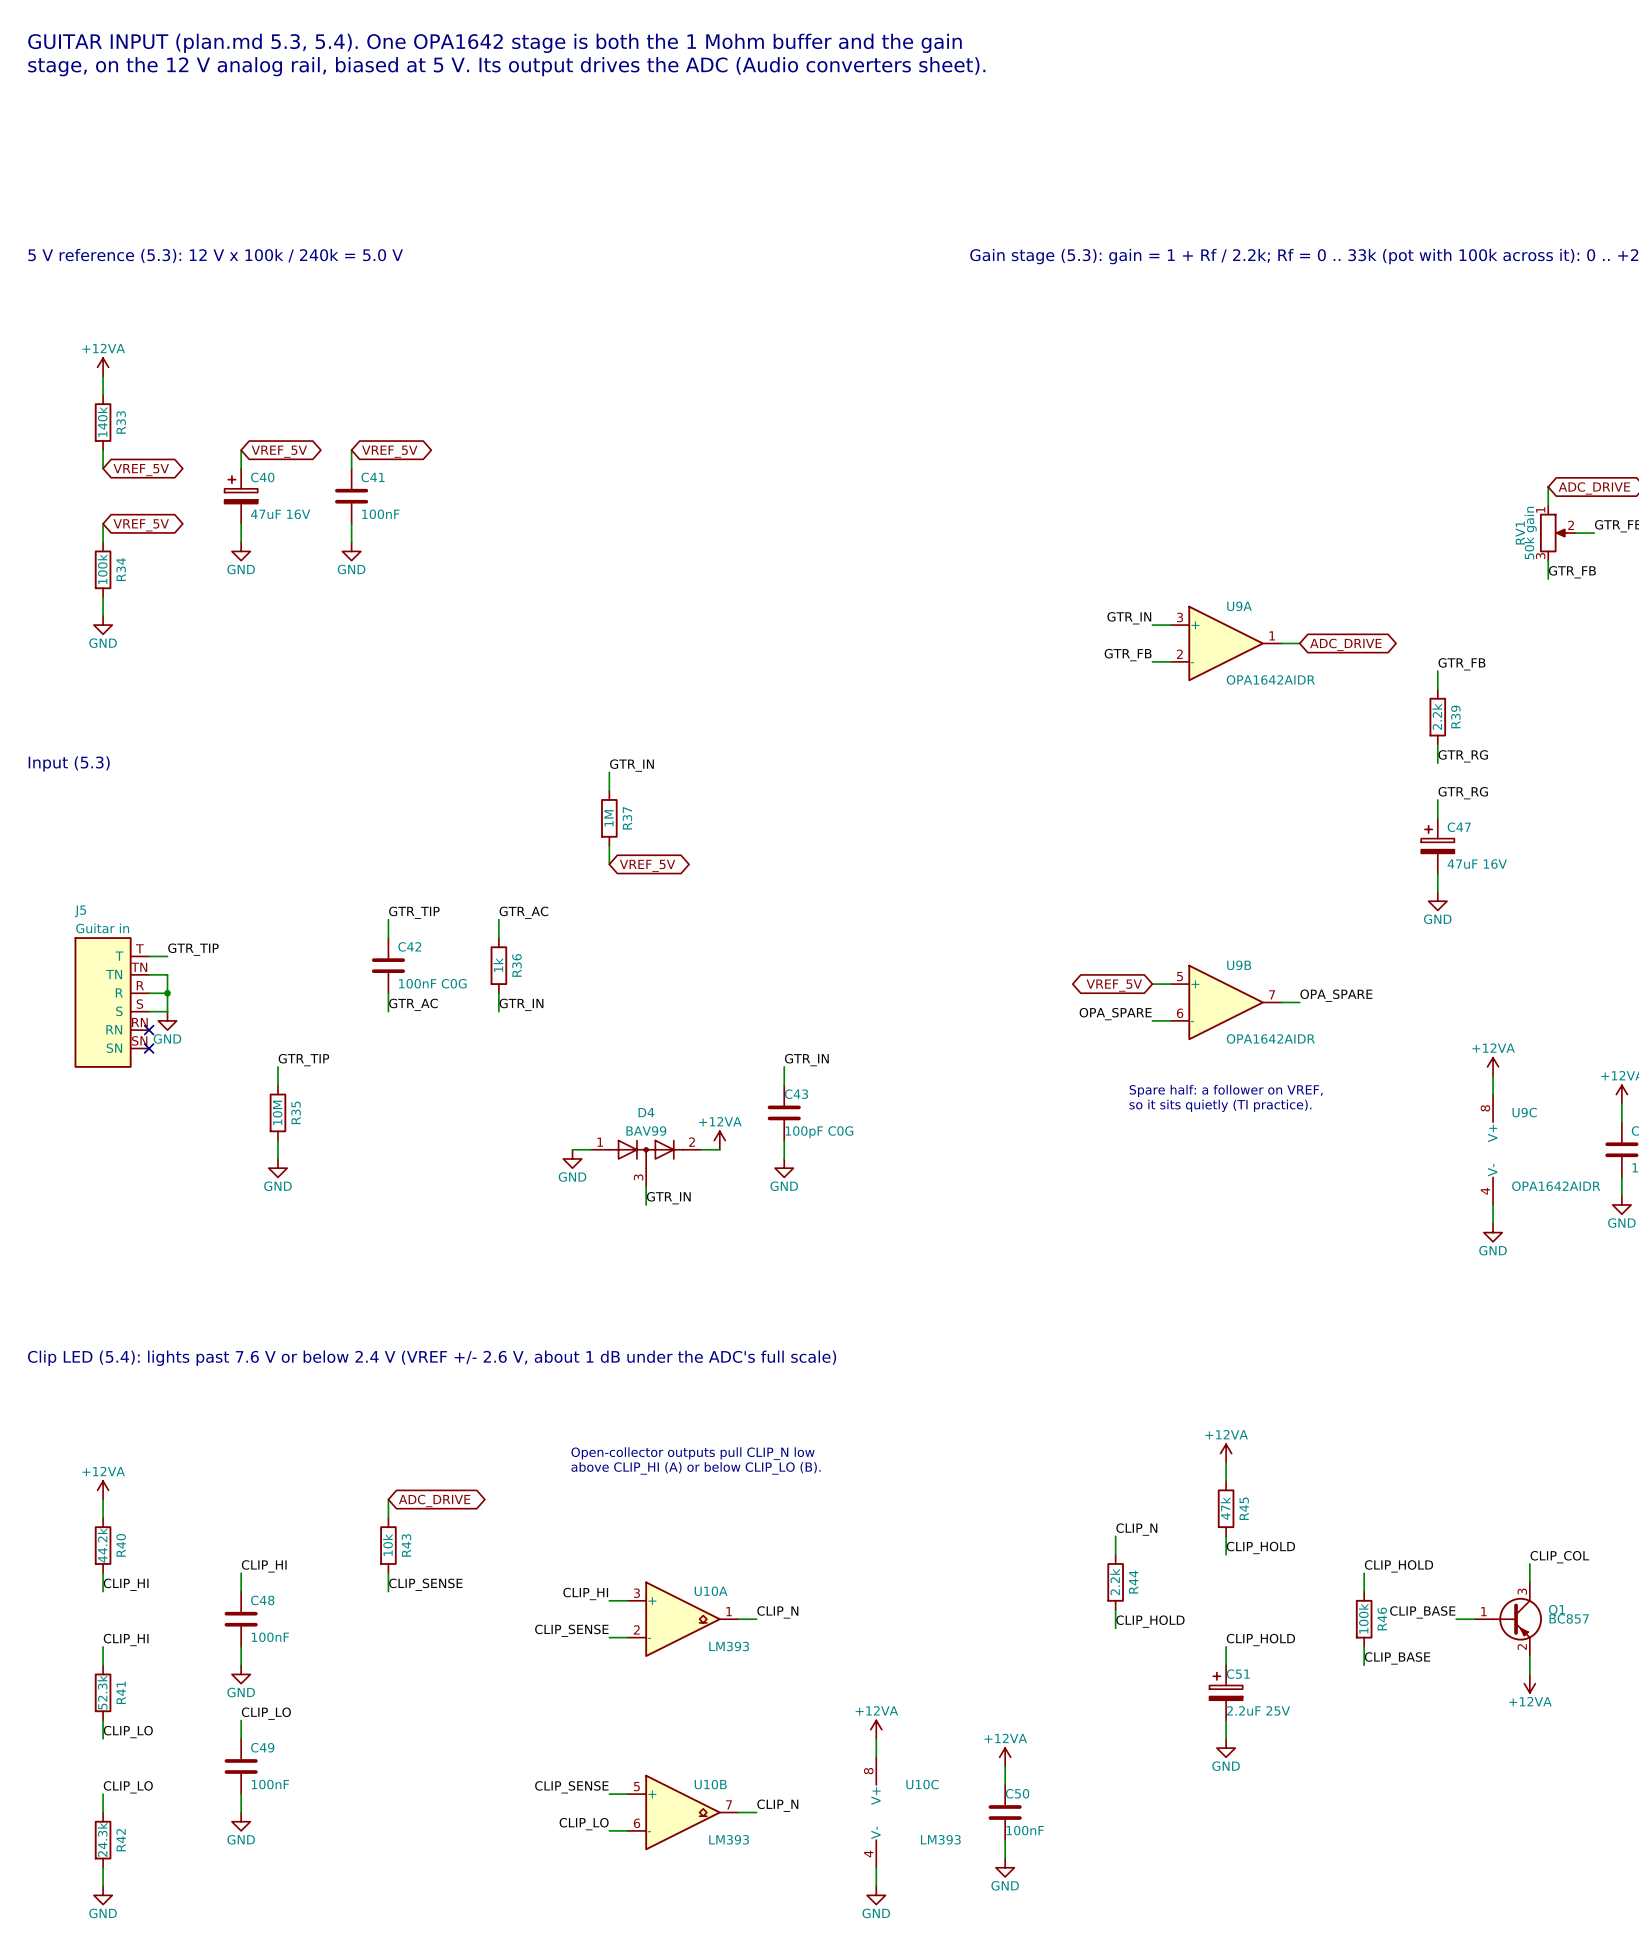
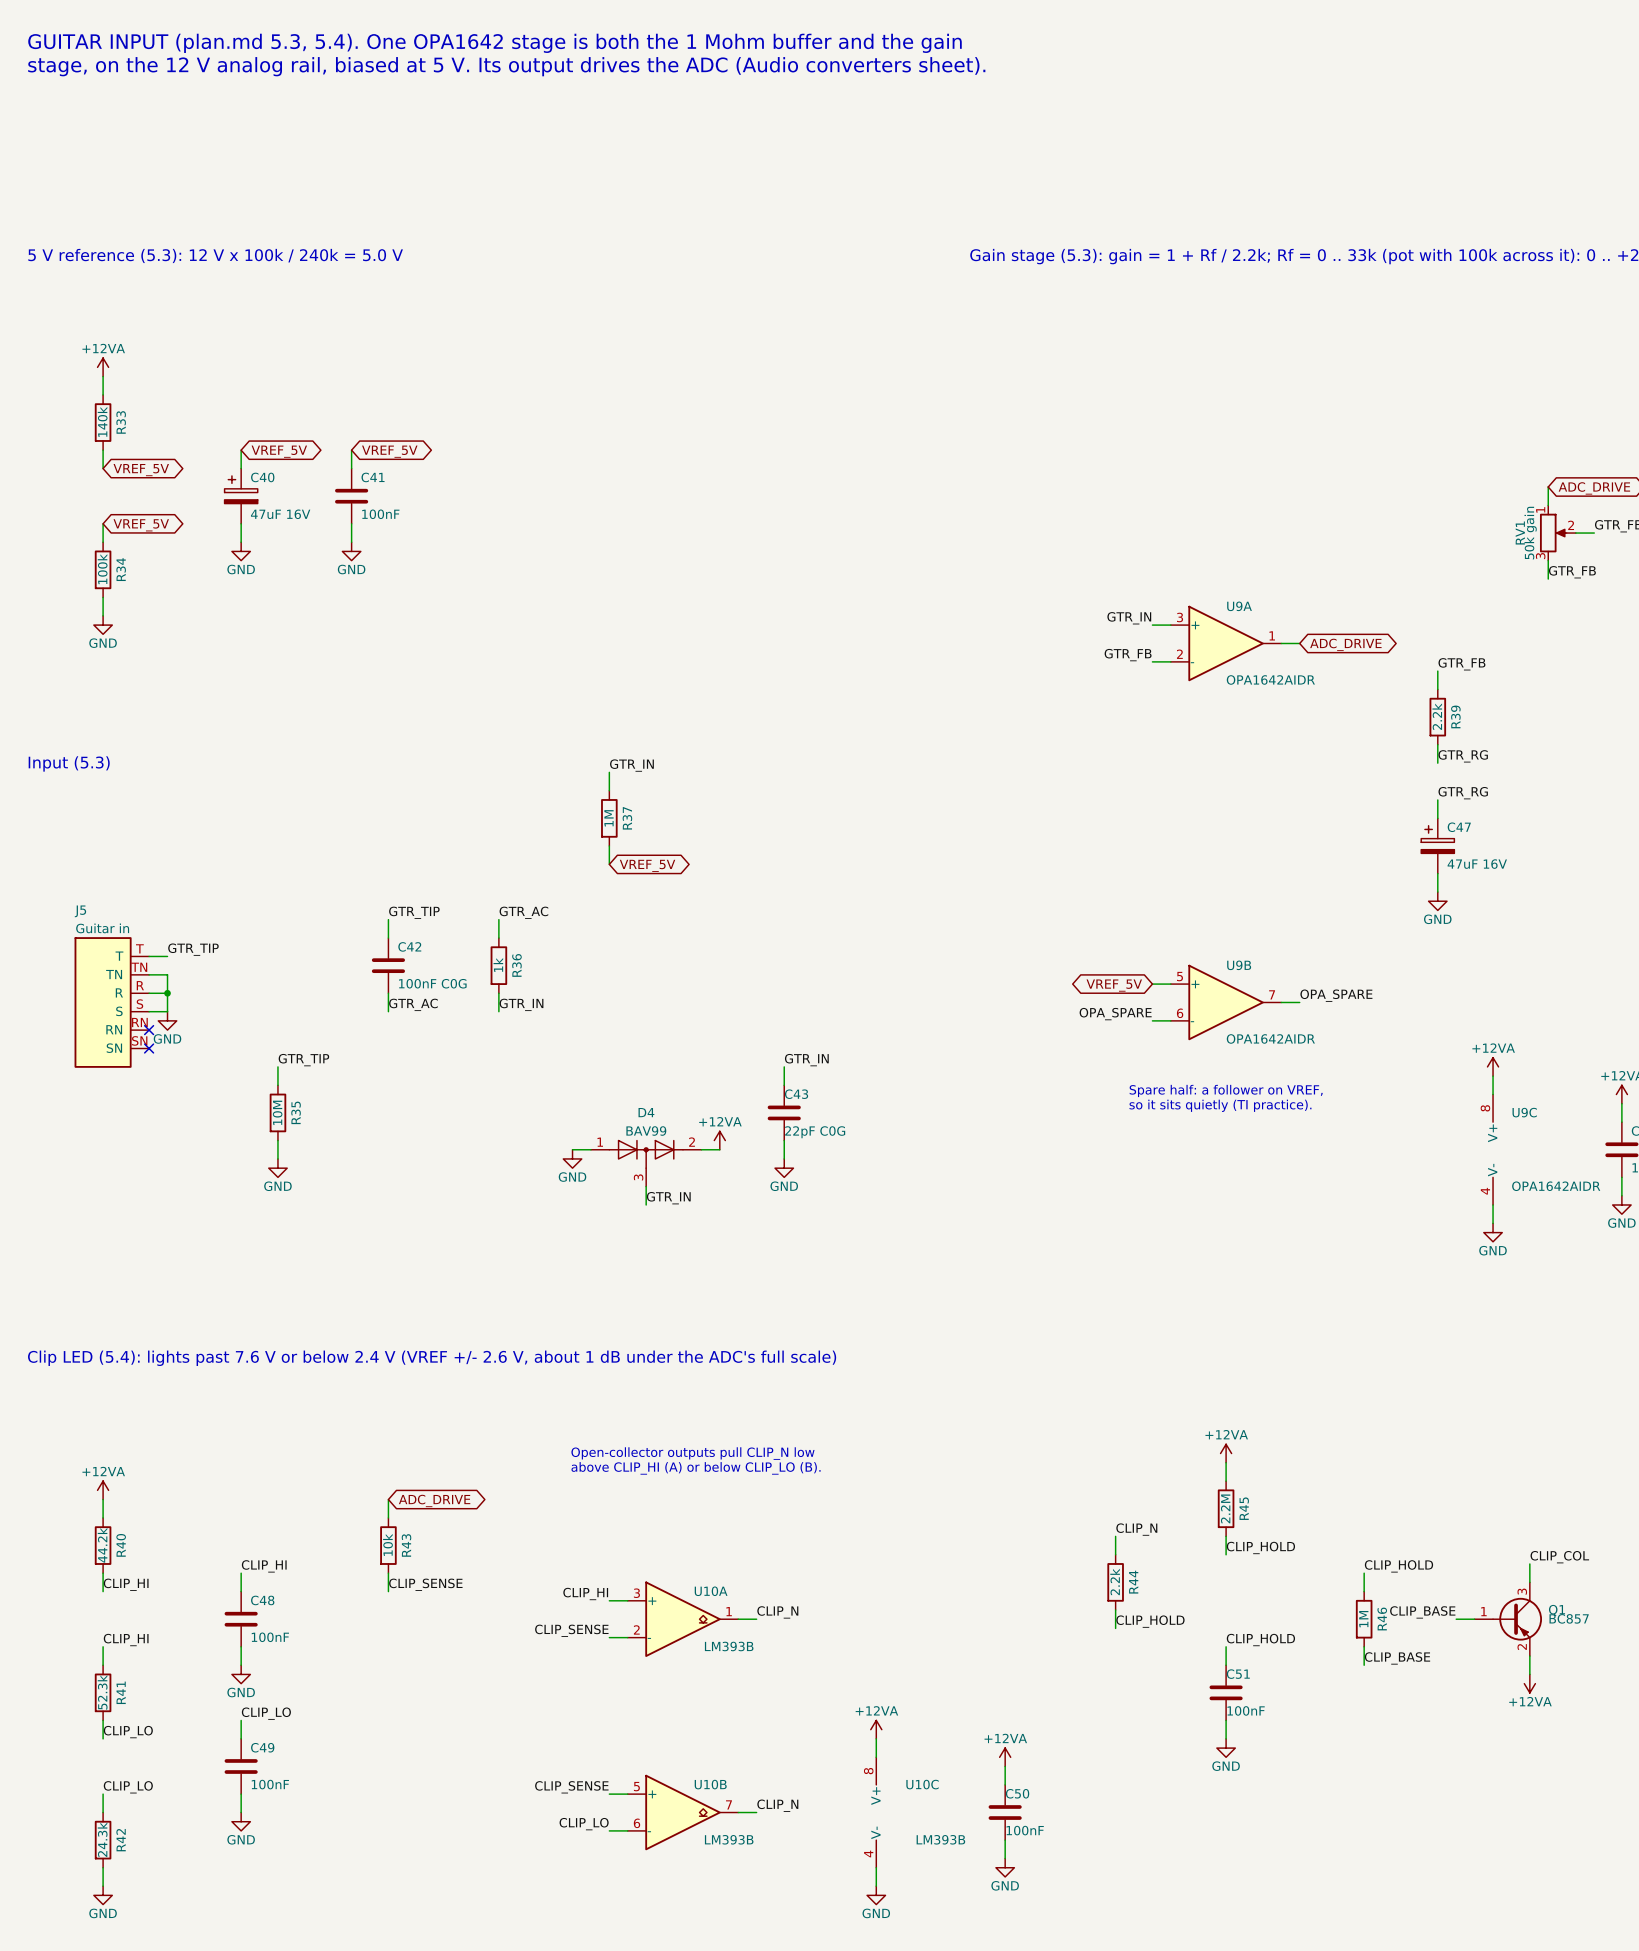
C43 value: 100pF C0G (819, 1132) -> 22pF C0G (815, 1132)
R45 value: 47k (1225, 1508) -> 2.2M (1225, 1508)
R46 value: 100k (1363, 1618) -> 1M (1363, 1619)
U10A value: LM393 (729, 1646) -> LM393B (729, 1646)
C51 symbol: [1209, 1665, 1243, 1721] -> [1209, 1665, 1243, 1721]
C51 value: 2.2uF 25V (1258, 1710) -> 100nF (1246, 1710)
U10B value: LM393 (729, 1839) -> LM393B (729, 1839)
U10C value: LM393 (940, 1839) -> LM393B (940, 1839)

